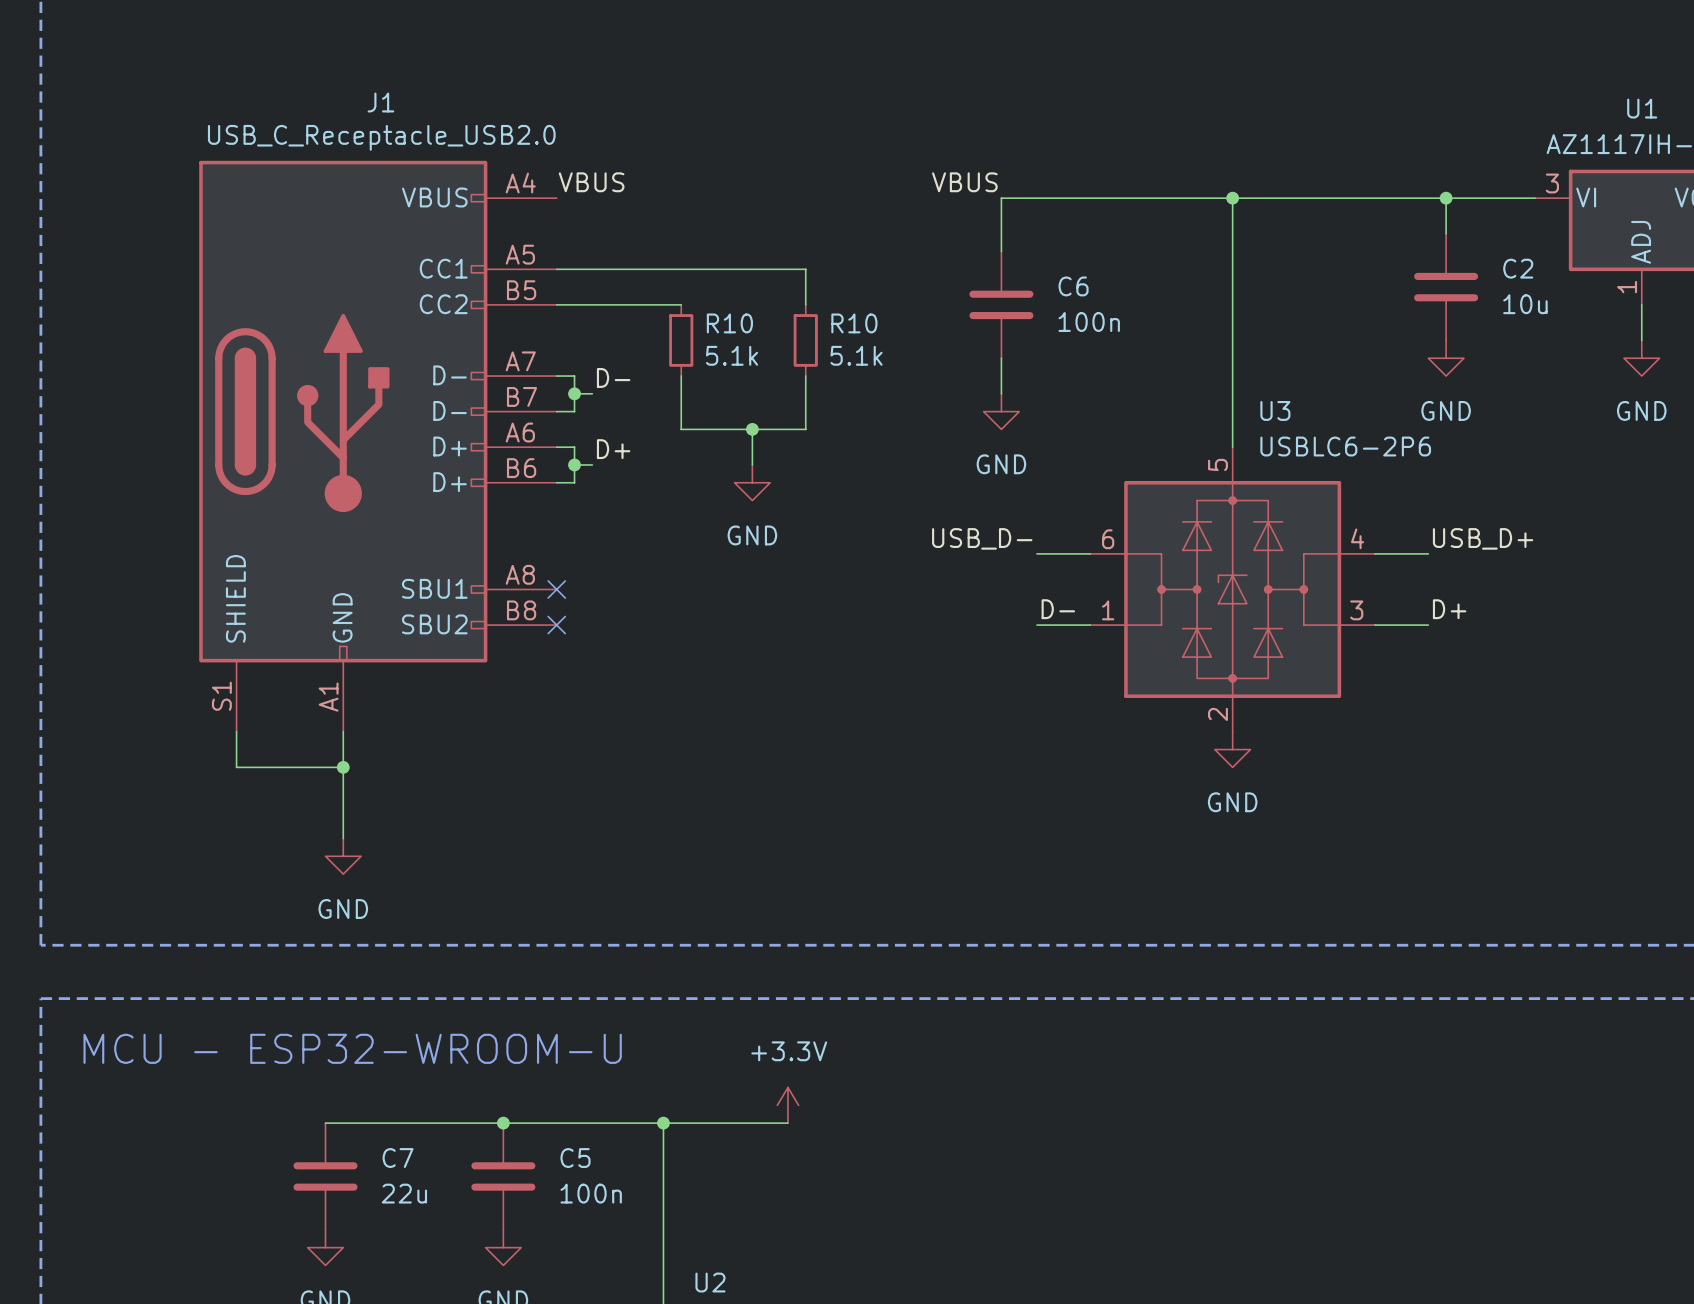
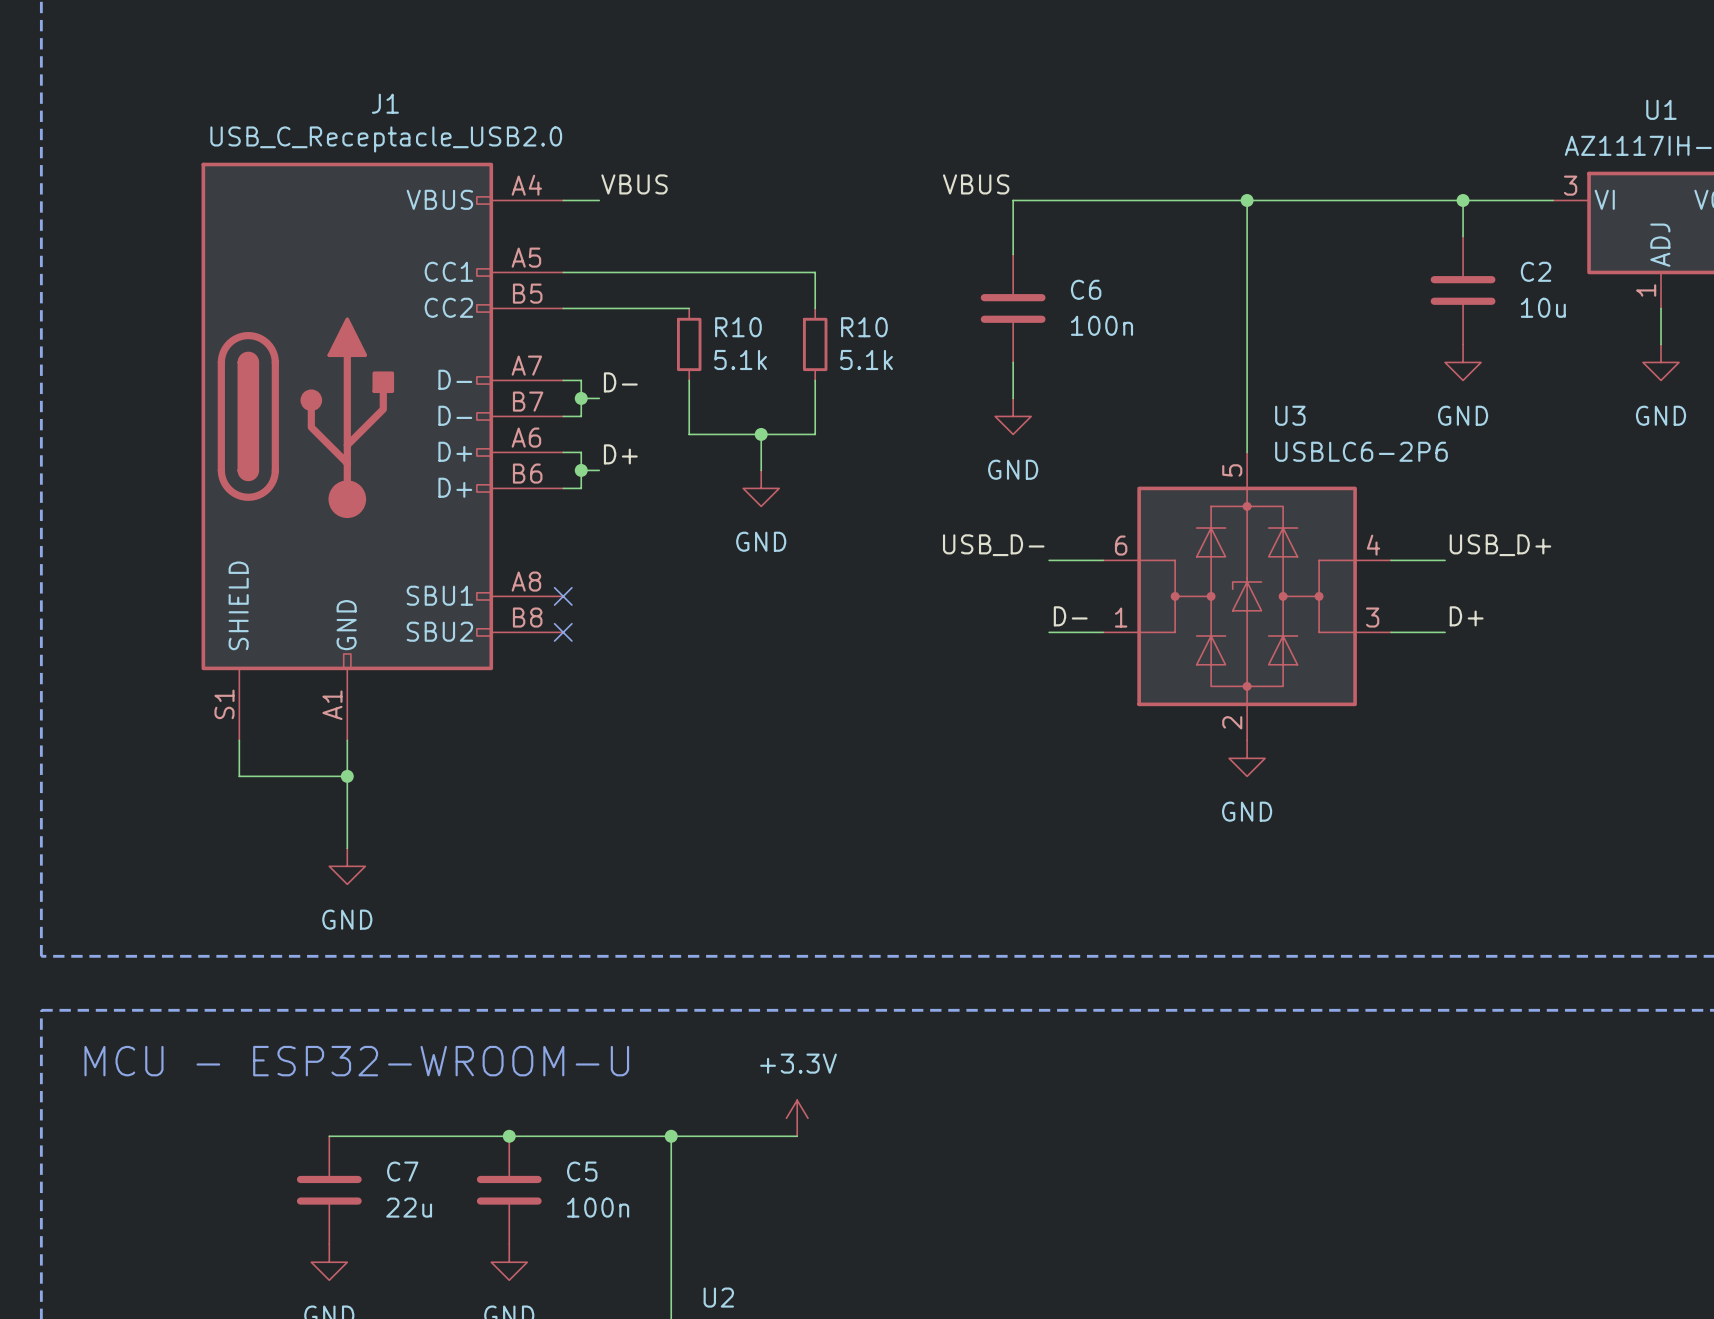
label position: VBUS (591, 182) -> VBUS (634, 184)
wire: none -> (563, 200) (599, 200)

